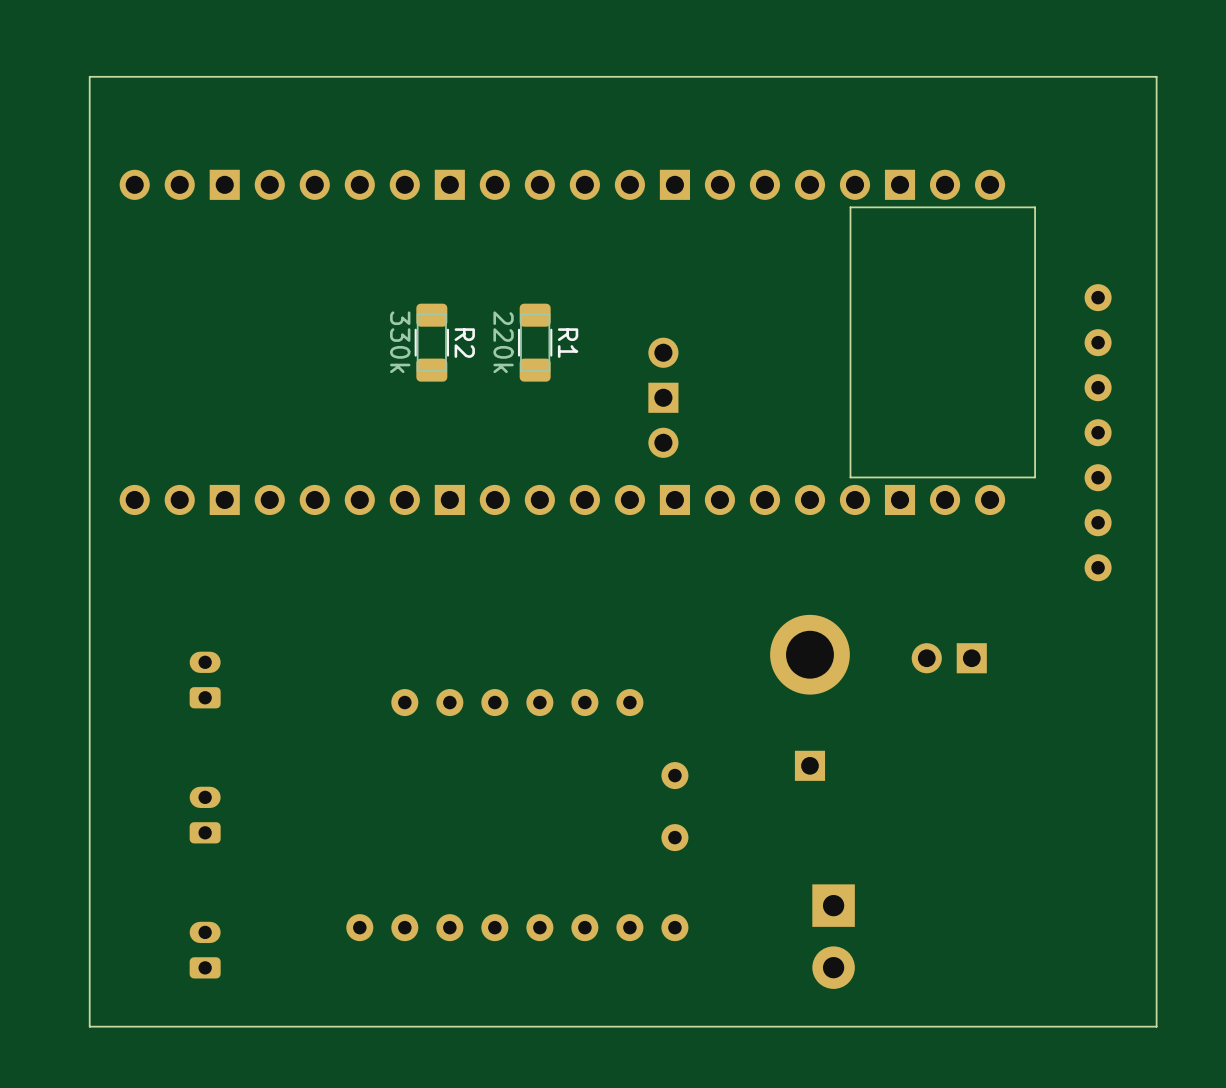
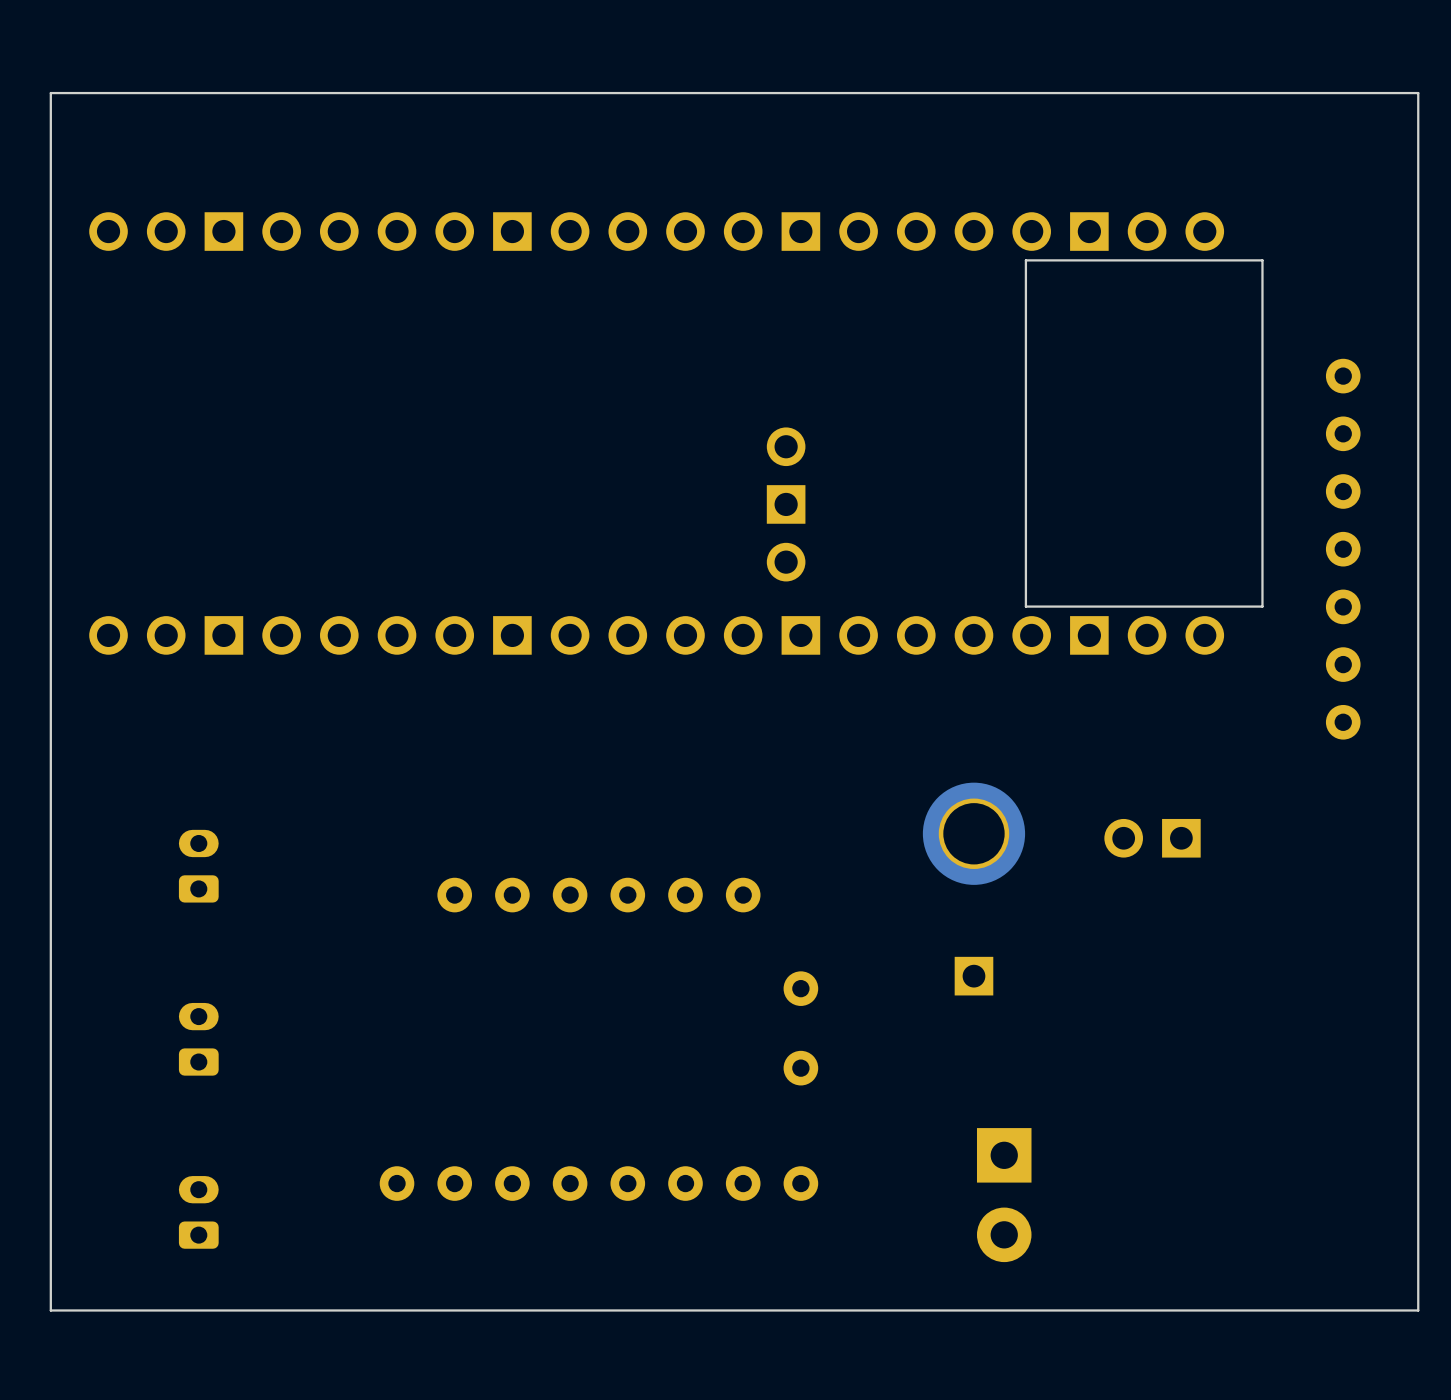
R2: 330k (431, 342) -> none
R1: 220k (535, 342) -> none

